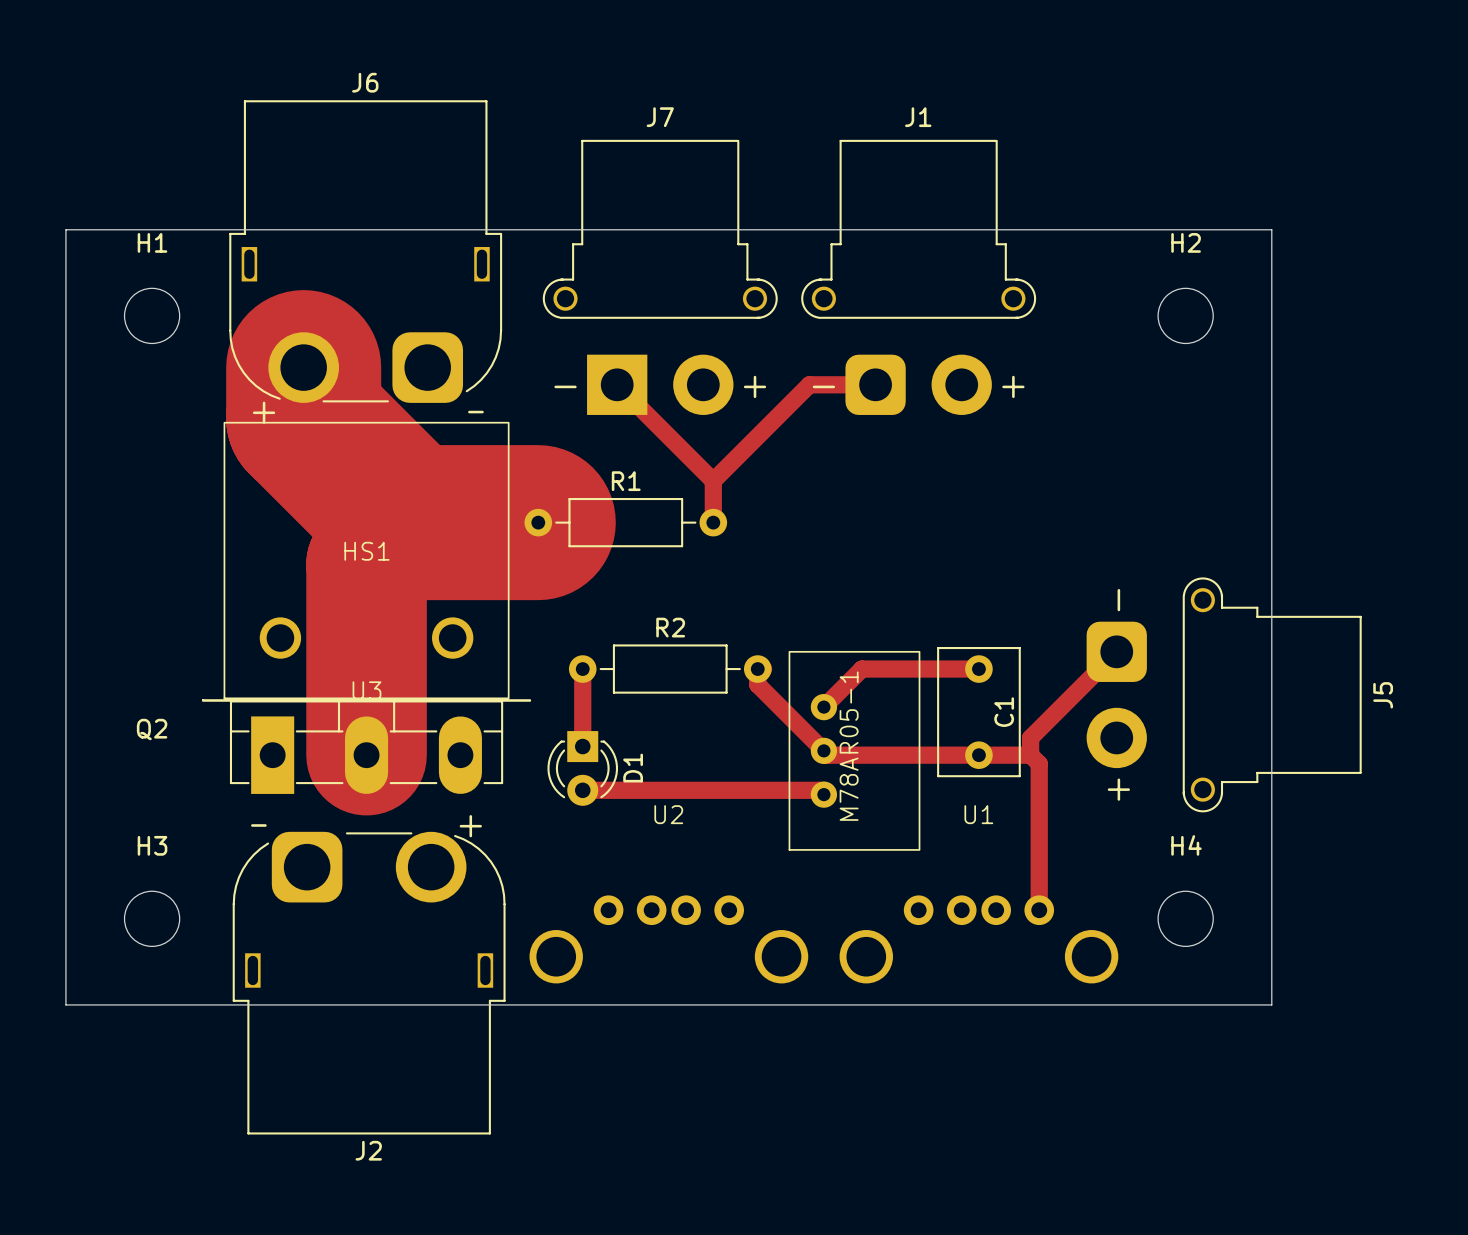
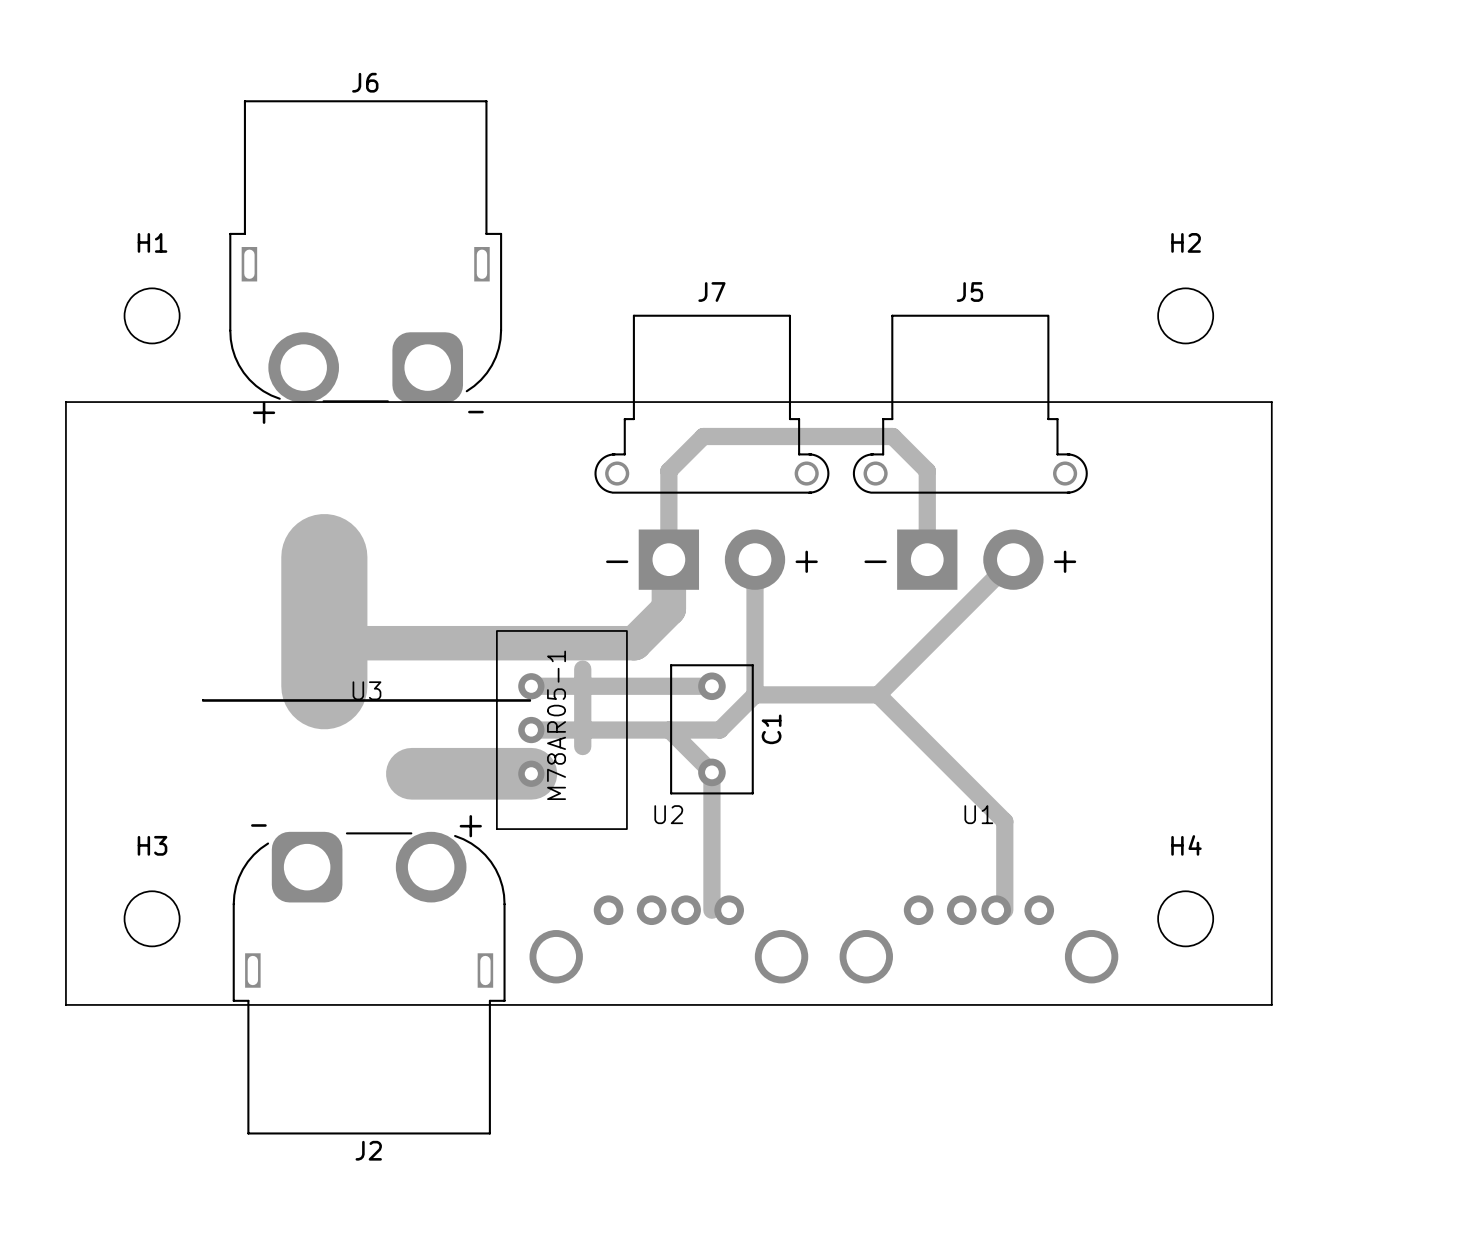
J7 position: (660, 277) -> (711, 452)
J1: (918, 277) -> none
track: (303, 367) (303, 418) (407, 522) -> none
track: (617, 384) (713, 480) -> none
track: (875, 384) (809, 384) (713, 480) -> none
board edge: (65, 402) (65, 229) (1271, 229) (1271, 402) -> (65, 402) (1271, 402)
track: (713, 480) (713, 522) -> none
track: (407, 522) (538, 522) -> none
track: (407, 522) (366, 563) (366, 755) -> none
R1: (625, 522) -> none
track: none -> (324, 557) (324, 686) (367, 643) (634, 643) (668, 608) (668, 470) (703, 436) (892, 436) (927, 470) (927, 559)
track: none -> (755, 559) (755, 694)
track: none -> (1013, 559) (878, 694)
HS1: (366, 560) -> none
J5 footprint: [1086, 577, 1362, 813] -> [852, 314, 1088, 590]
track: (1116, 651) (1030, 737) (1030, 755) -> none
R2: (670, 669) -> none
track: (763, 669) (757, 669) (757, 684) (828, 755) (1030, 755) -> none
track: (978, 669) (861, 669) (823, 707) -> none
track: none -> (531, 686) (711, 686)
track: none -> (755, 694) (878, 694)
track: none -> (755, 694) (719, 730) (531, 730)
track: none -> (878, 694) (1004, 821) (1004, 910)
J5 name position: J5 (1383, 695) -> J5 (969, 292)
C1 position: (978, 712) -> (711, 729)
C1 name position: C1 (1004, 712) -> C1 (771, 729)
track: none -> (669, 730) (711, 772) (711, 910)
Q2: (366, 747) -> none
M78AR05-1 position: (854, 750) -> (561, 730)
track: (1030, 755) (1039, 763) (1039, 910) -> none
D1: (582, 768) -> none
track: none -> (410, 772) (531, 773)
track: (582, 790) (819, 790) (823, 794) -> none

